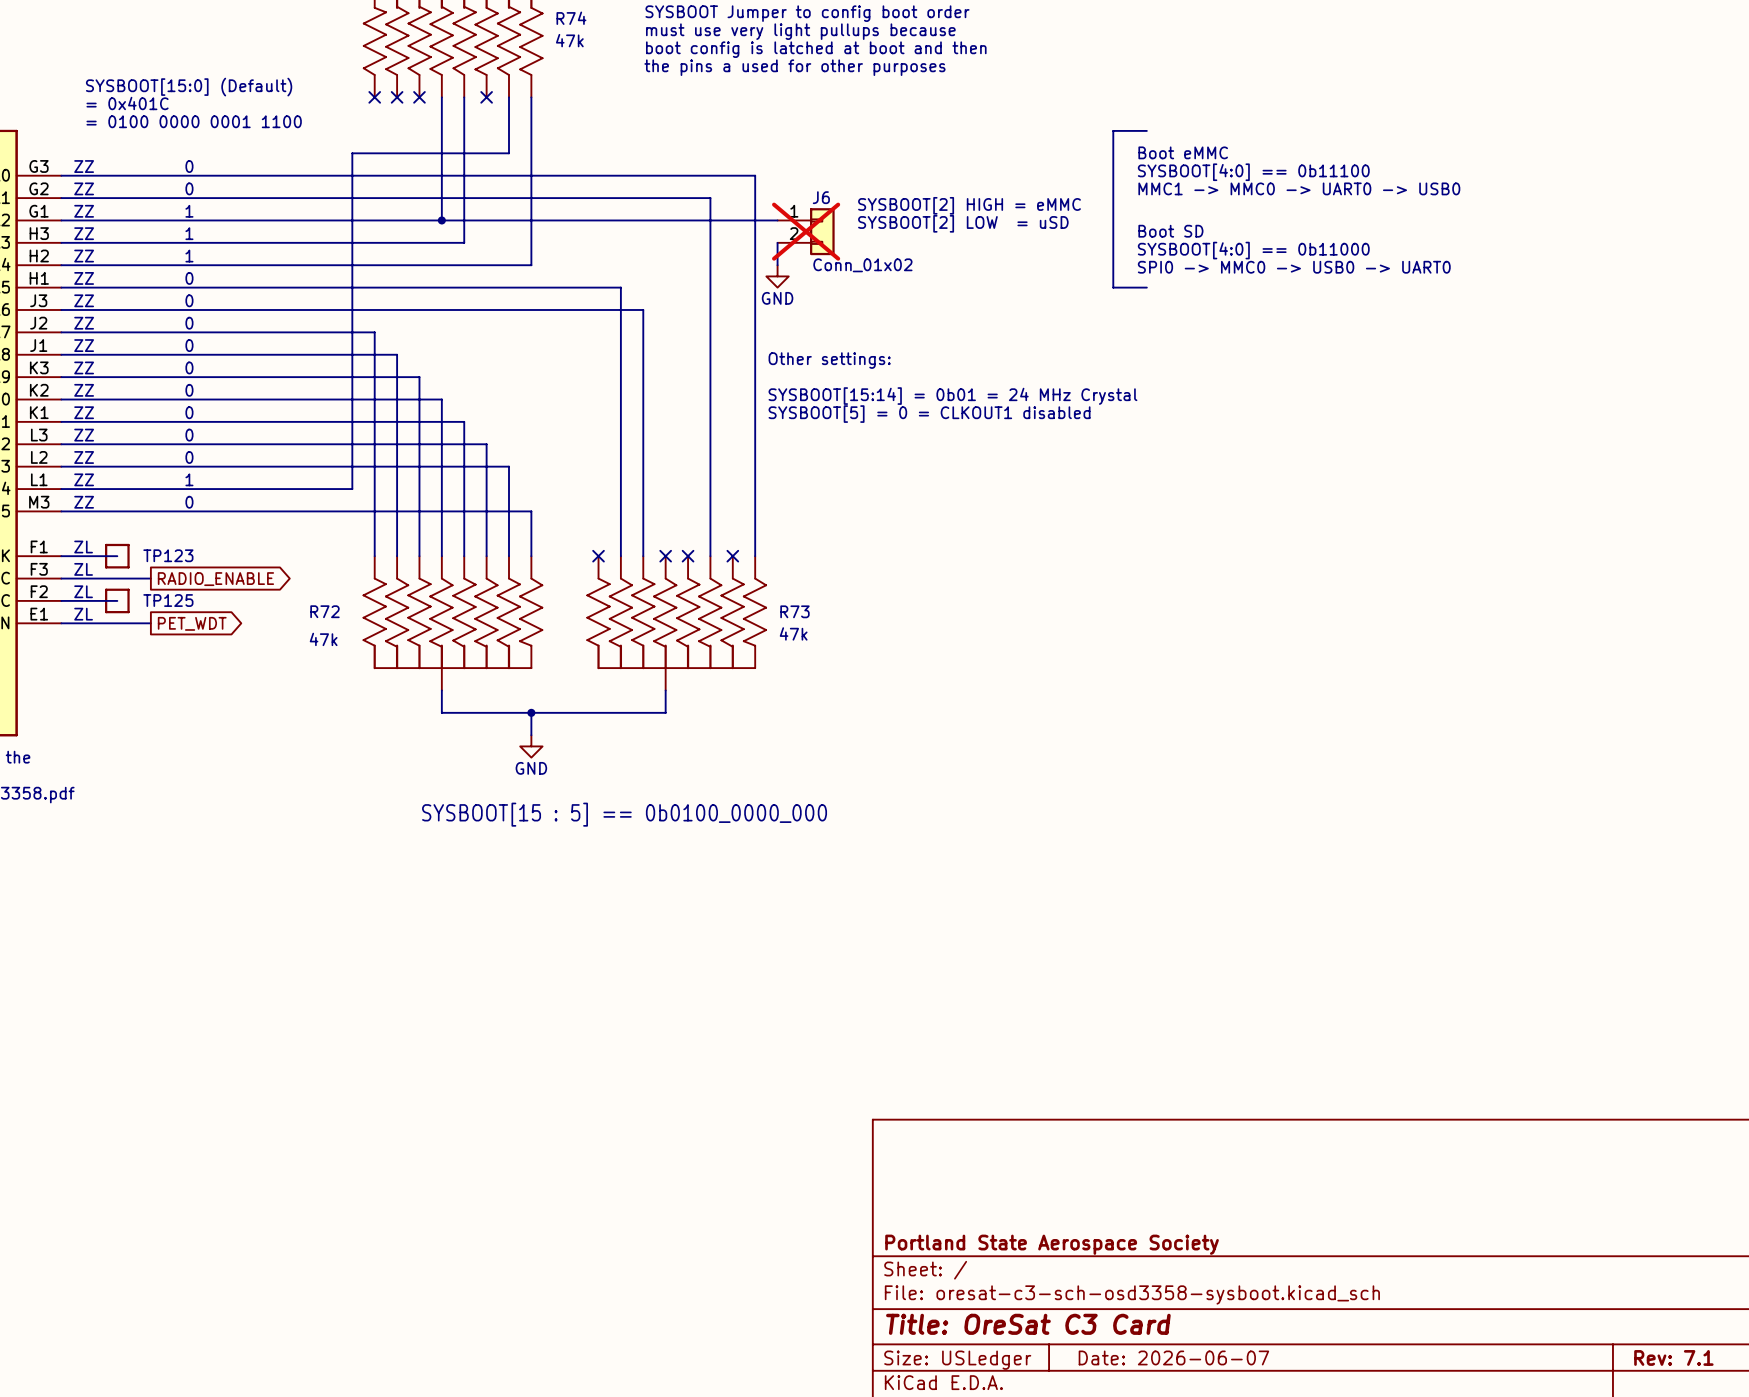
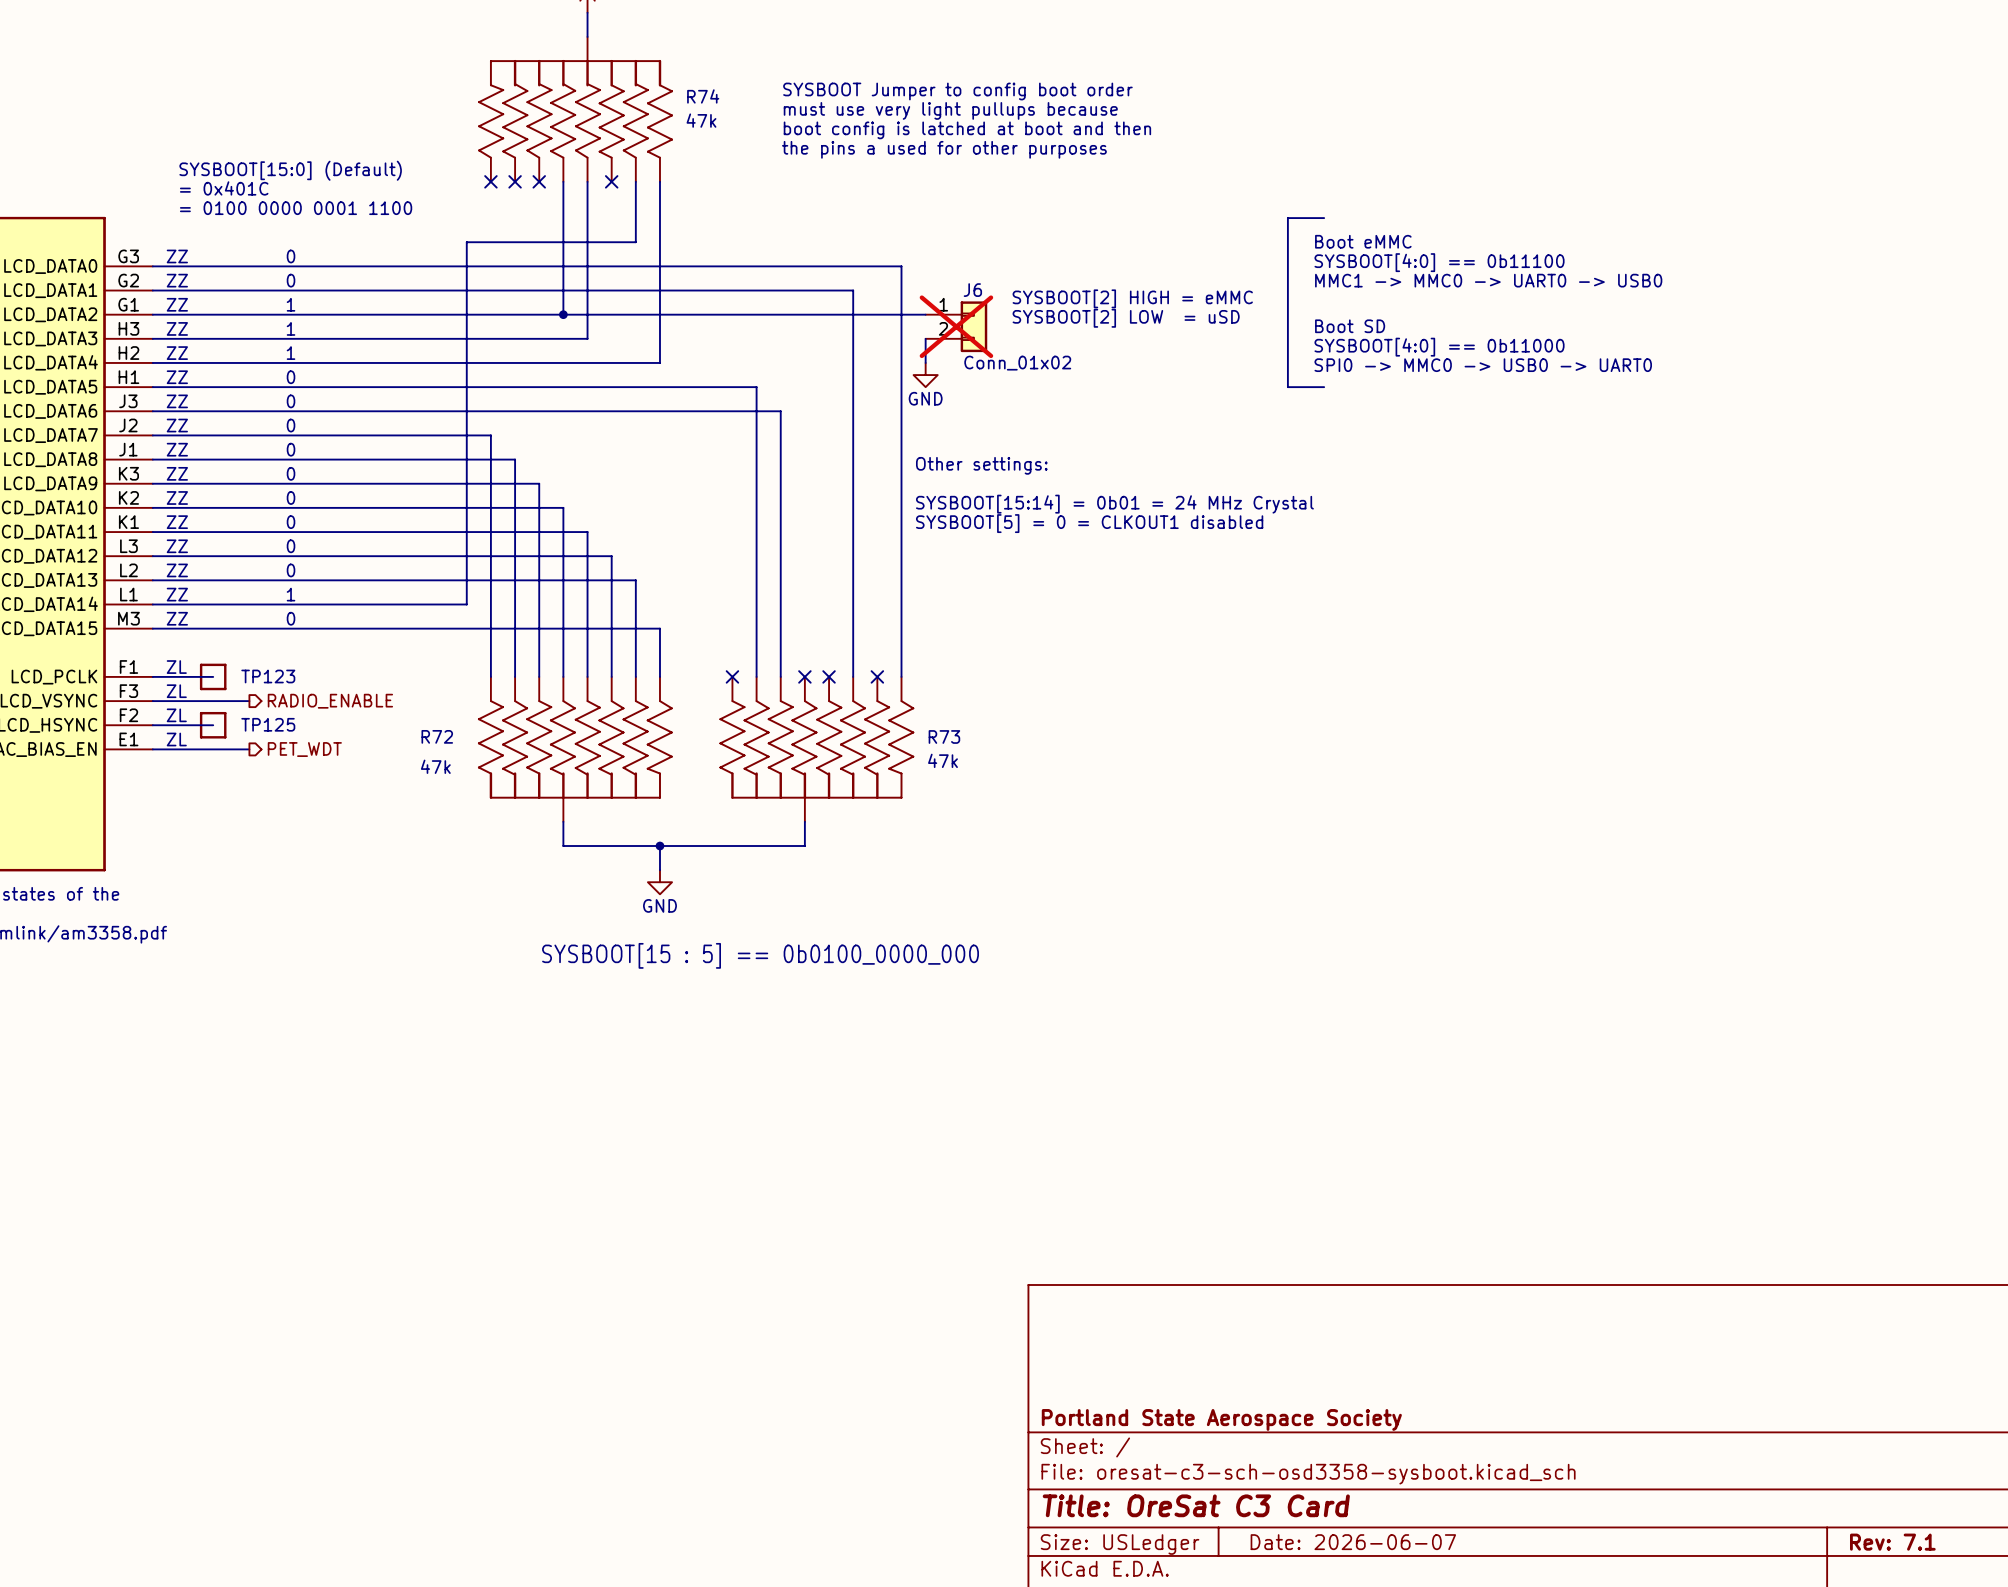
hierarchical label: none -> RADIO_ENABLE (330, 701)
global label: RADIO_ENABLE (215, 579) -> none
global label: PET_WDT (192, 623) -> none
hierarchical label: none -> PET_WDT (304, 749)

